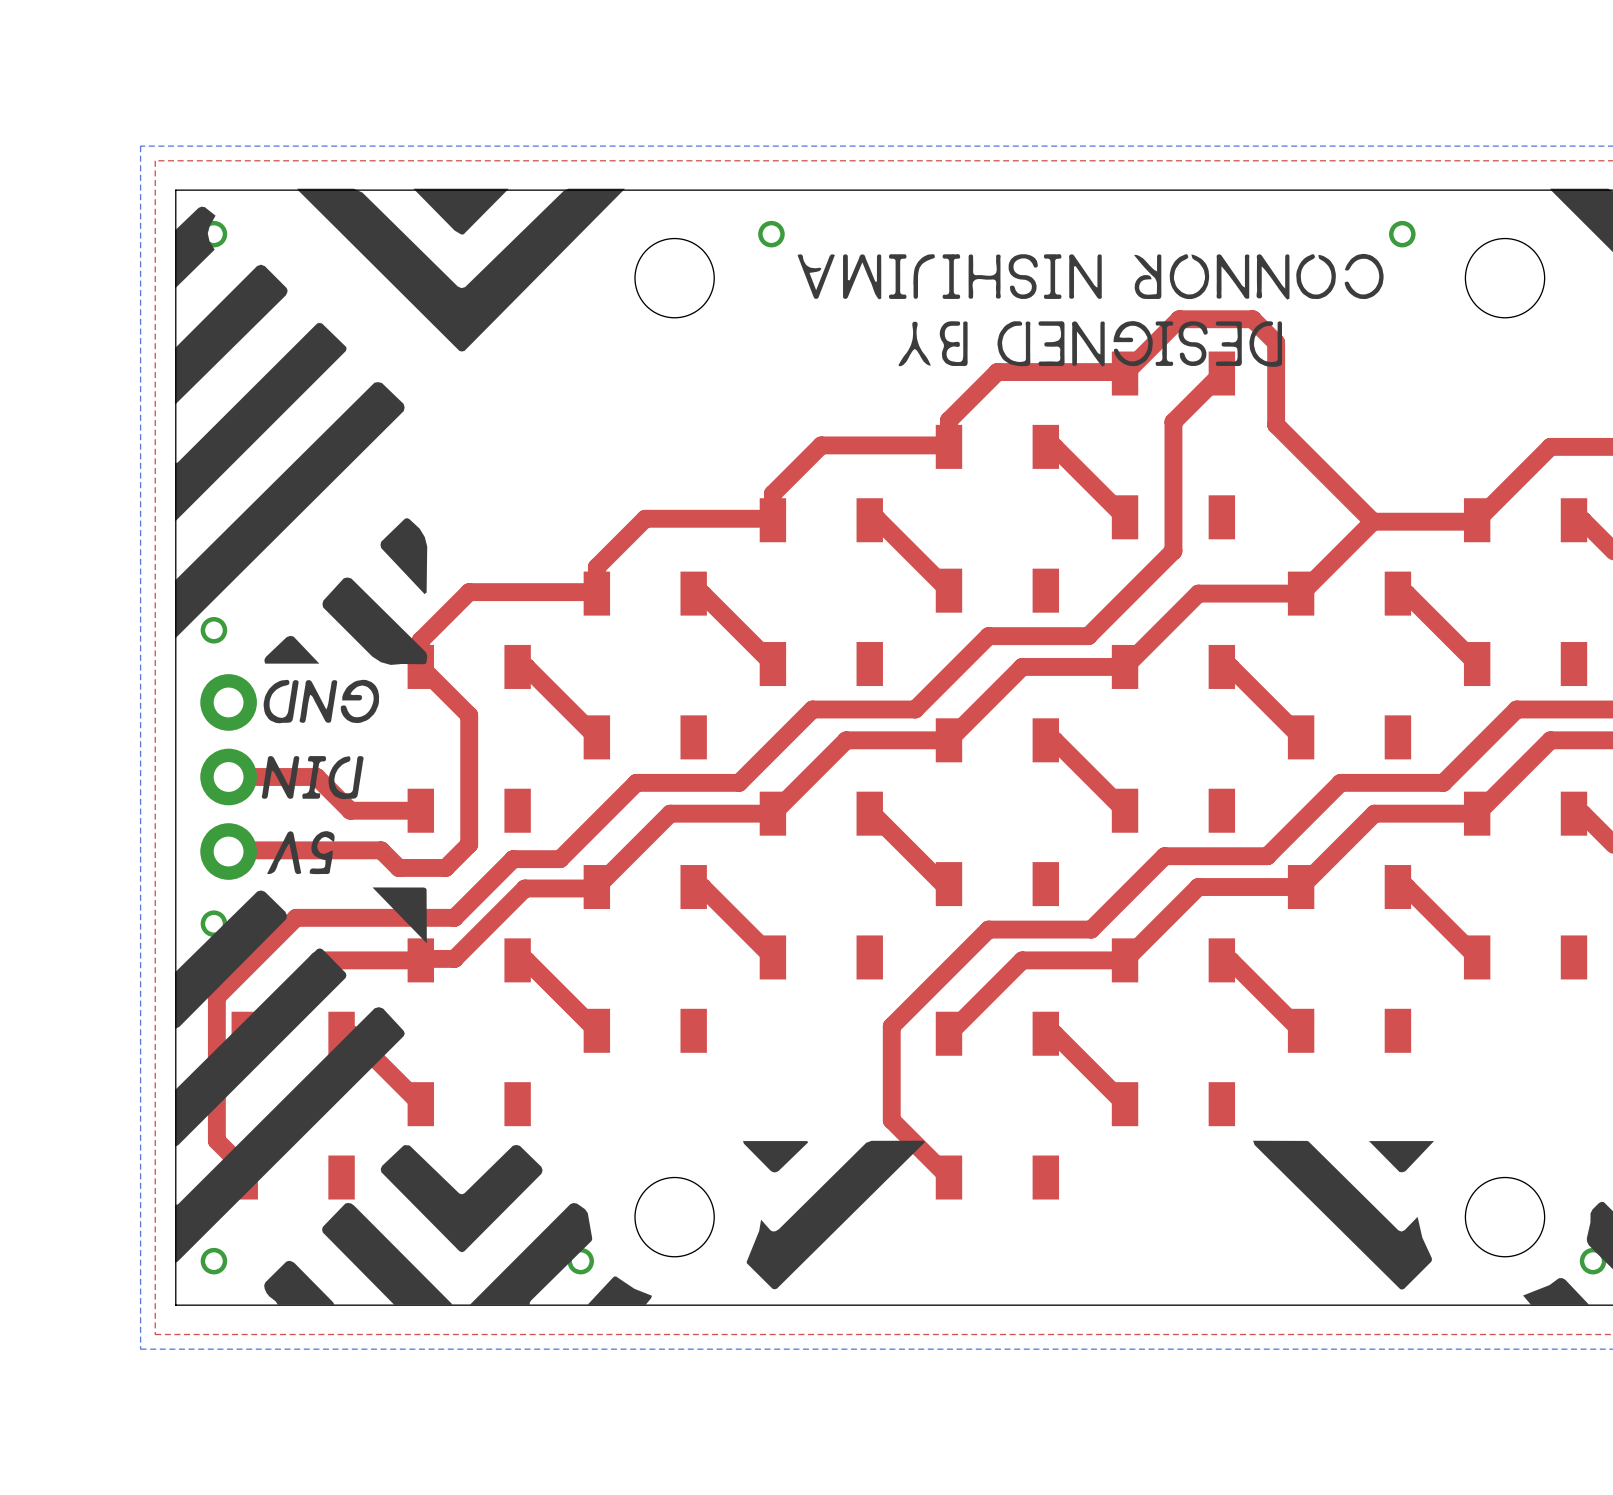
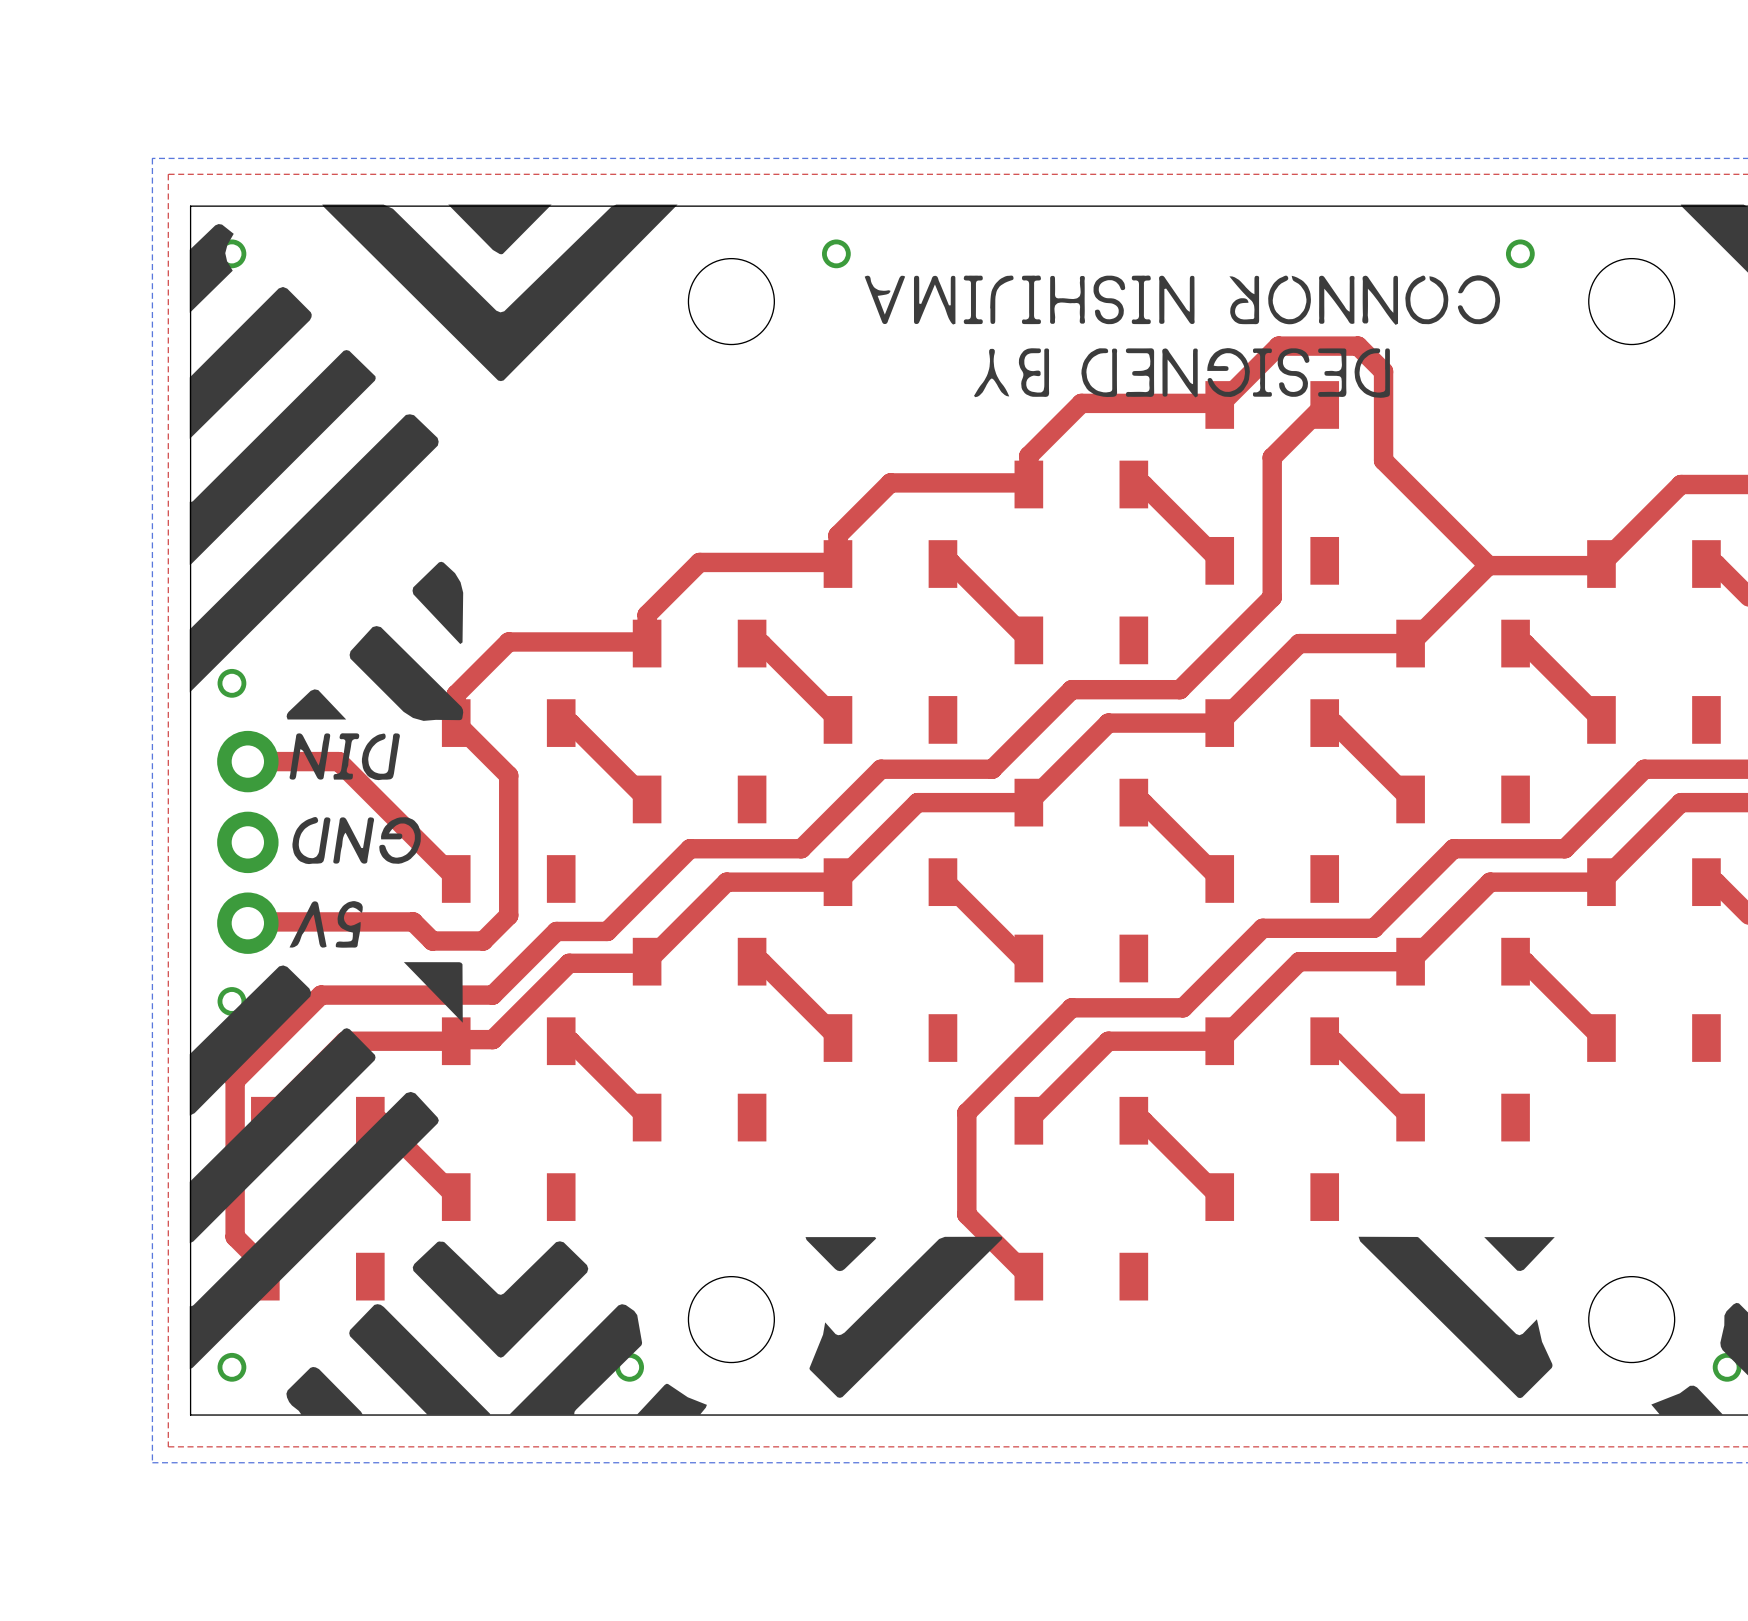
drawing: [263, 679, 380, 724] -> none
drawing: none -> [292, 817, 421, 865]
top track: (228, 776) (316, 776) (350, 810) (420, 810) -> (247, 761) (338, 761) (456, 878)
drawing position: (280, 777) -> (309, 756)
drawing position: (314, 777) -> (346, 756)
drawing position: (346, 777) -> (380, 756)

